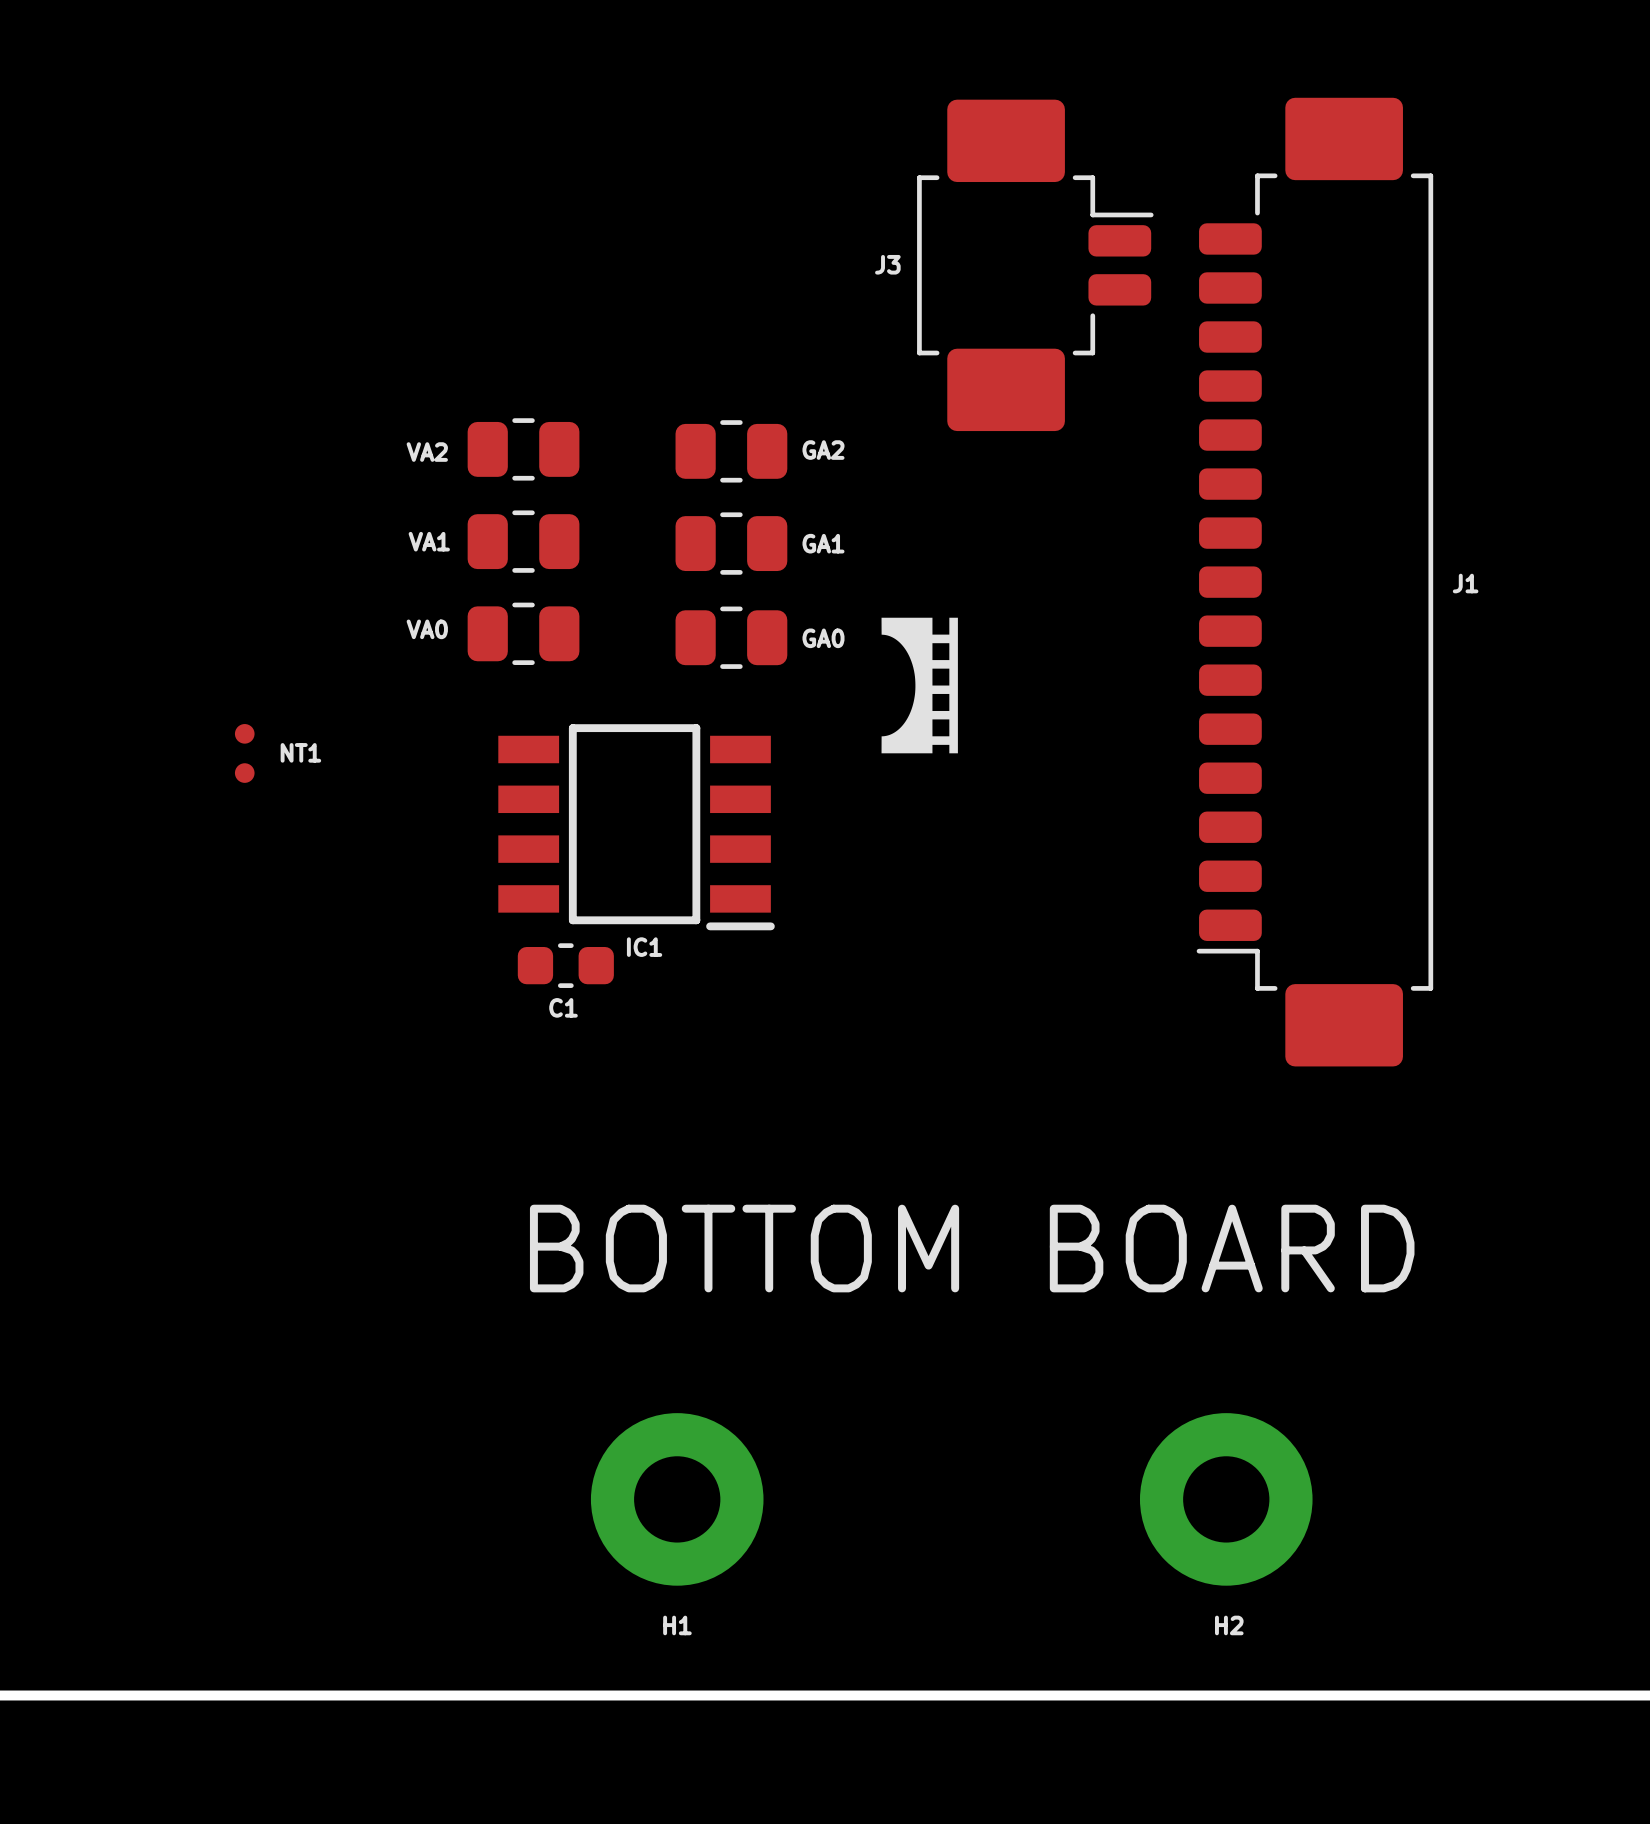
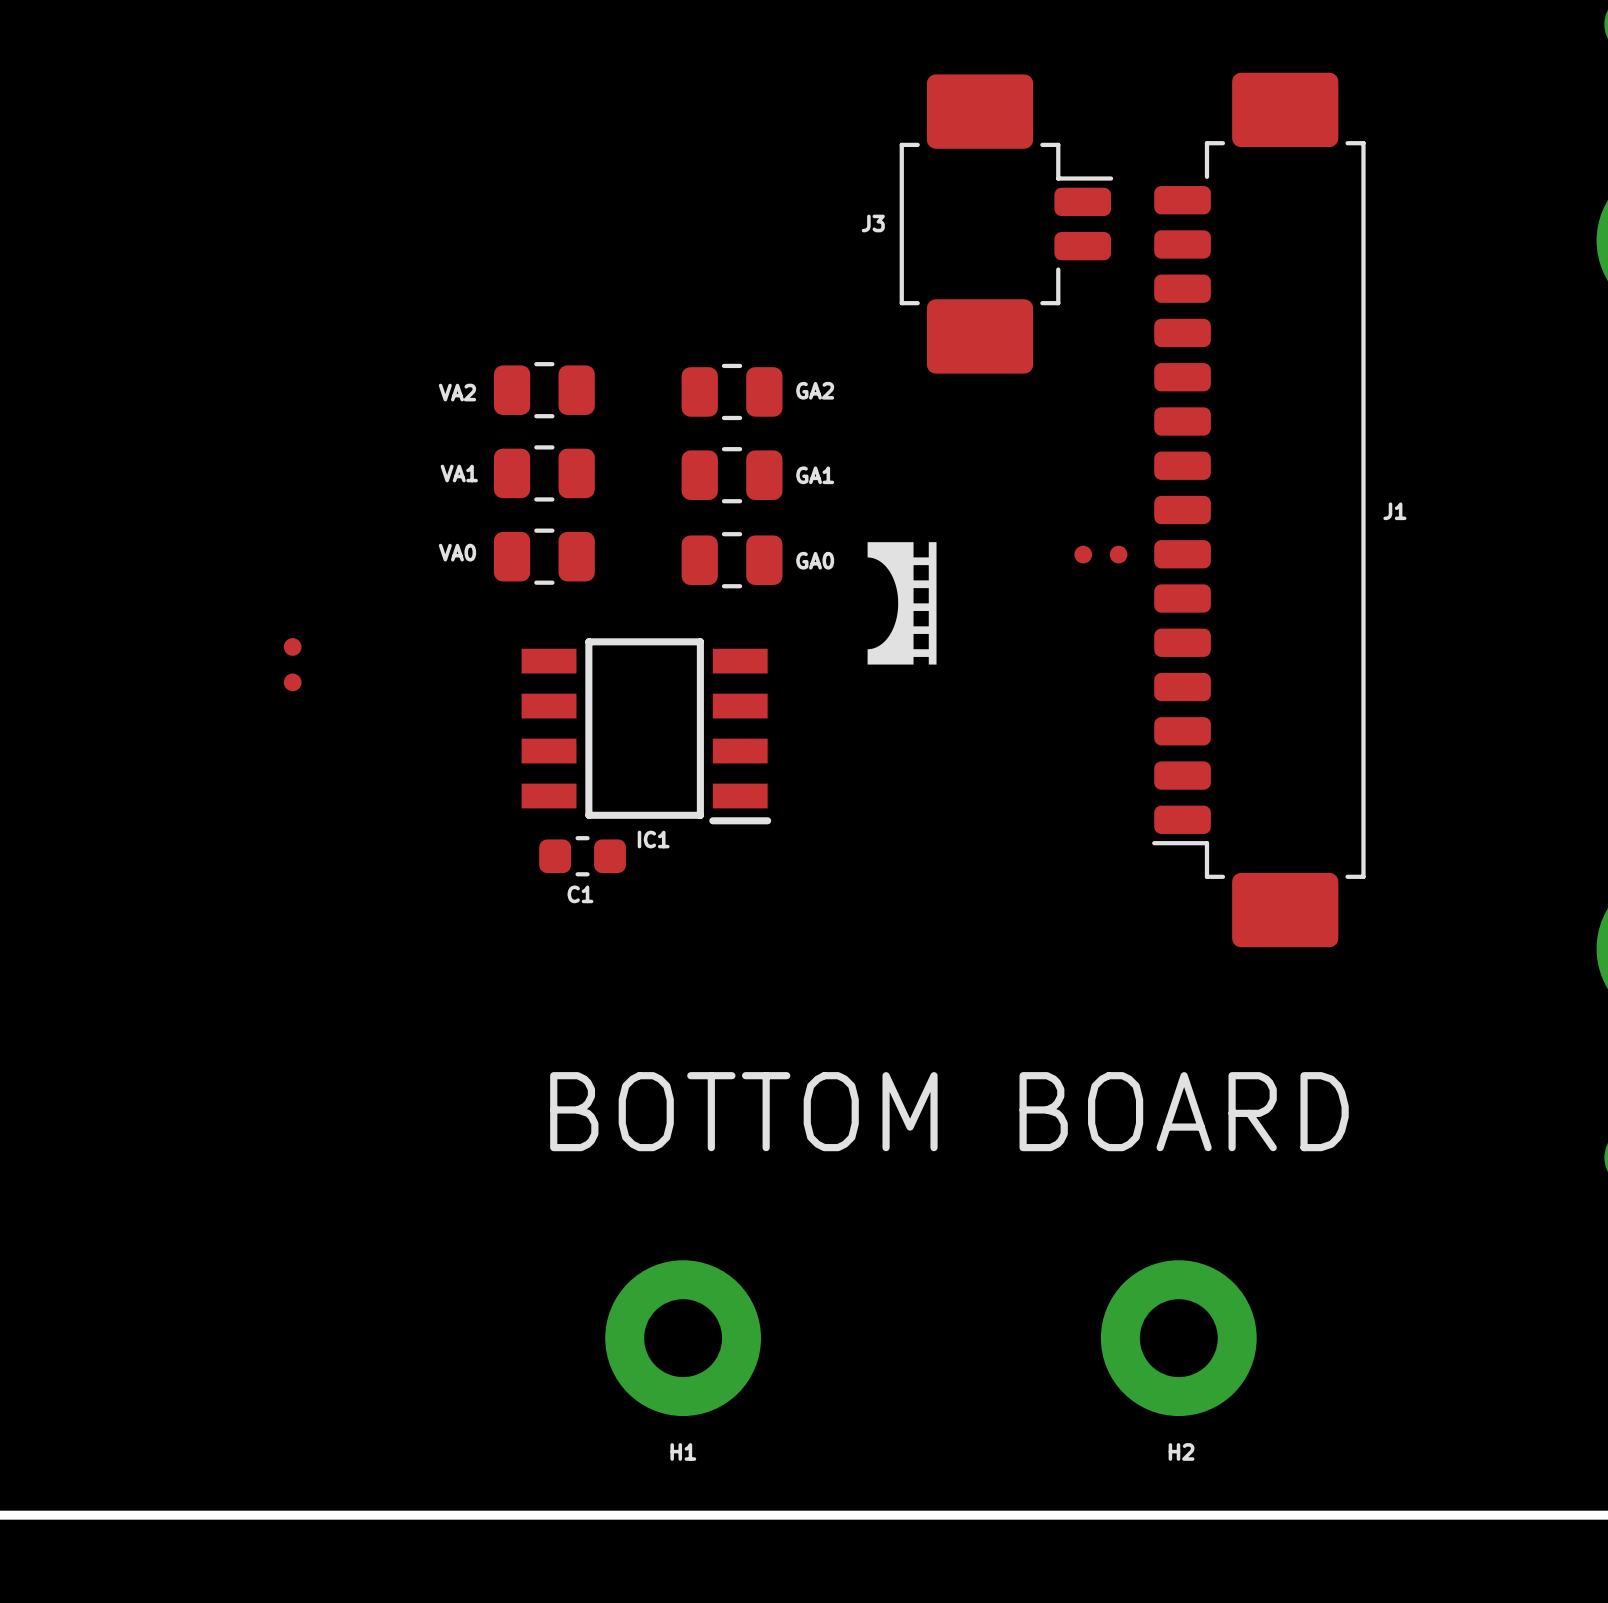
part: none -> (1100, 554)
NT1 name: NT1 (300, 752) -> none

